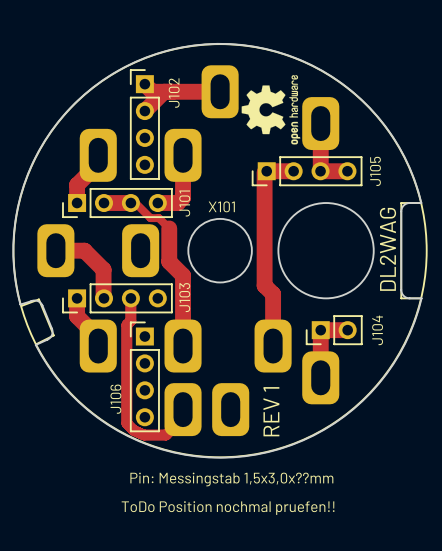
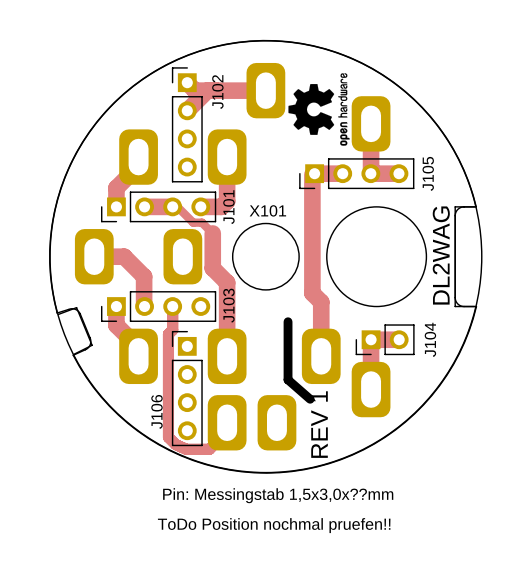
board edge: none -> (288, 321) (288, 379) (310, 399)

